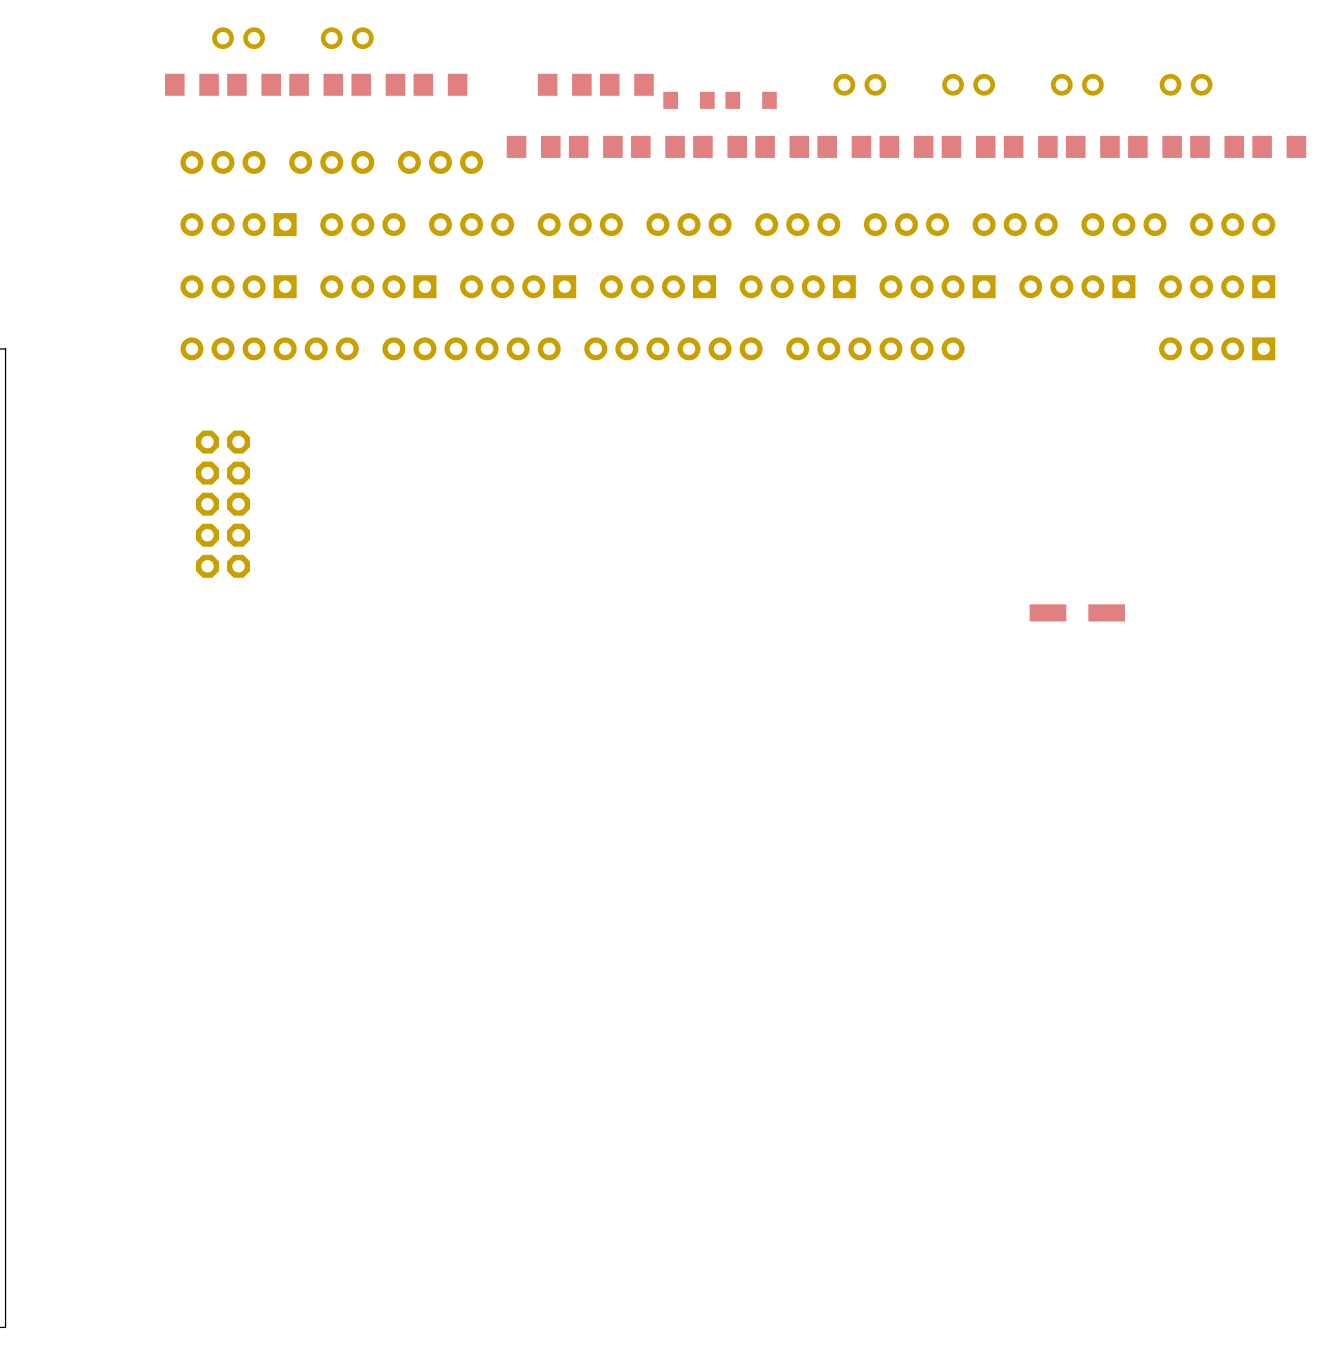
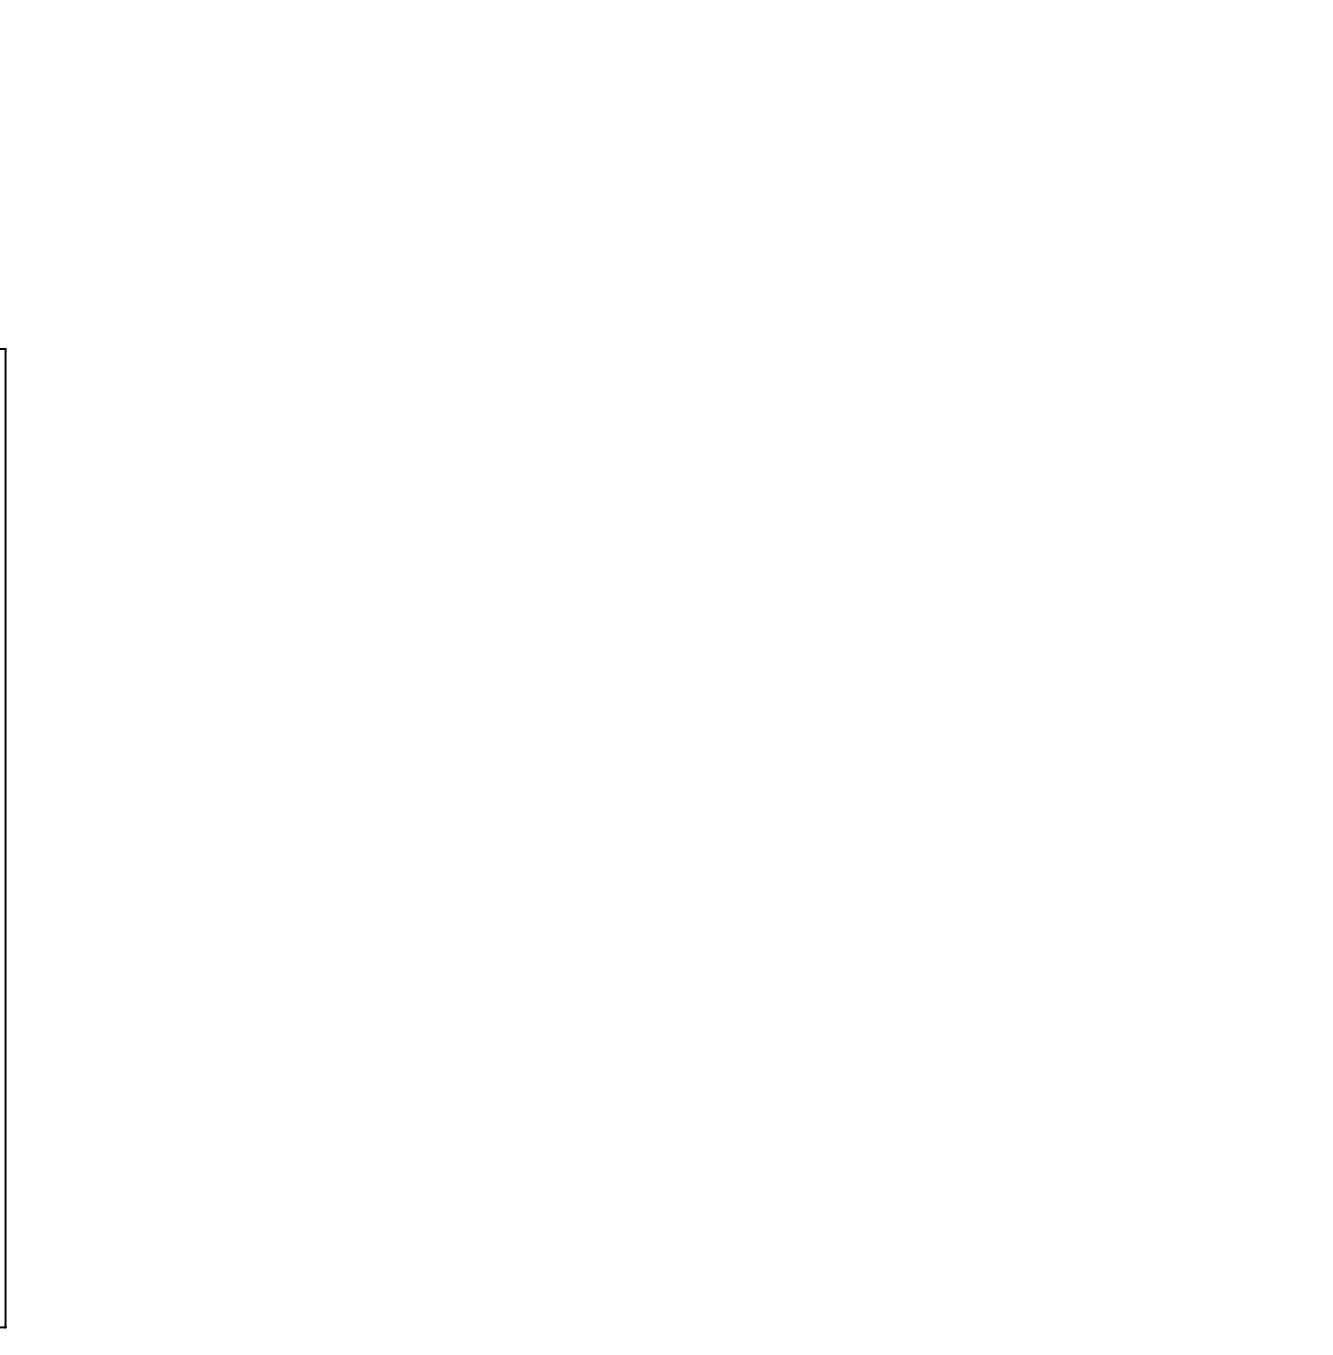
part: (238, 38) -> none
part: (347, 38) -> none
part: (191, 84) -> none
part: (254, 84) -> none
part: (316, 84) -> none
part: (378, 84) -> none
part: (440, 84) -> none
part: (564, 84) -> none
part: (626, 84) -> none
part: (859, 84) -> none
part: (968, 84) -> none
part: (1077, 84) -> none
part: (1186, 84) -> none
part: (689, 100) -> none
part: (751, 100) -> none
part: (533, 146) -> none
part: (595, 146) -> none
part: (657, 146) -> none
part: (720, 146) -> none
part: (782, 146) -> none
part: (844, 146) -> none
part: (906, 146) -> none
part: (968, 146) -> none
part: (1030, 146) -> none
part: (1092, 146) -> none
part: (1154, 146) -> none
part: (1217, 146) -> none
part: (1279, 146) -> none
part: (223, 162) -> none
part: (331, 162) -> none
part: (440, 162) -> none
part: (238, 224) -> none
part: (362, 224) -> none
part: (471, 224) -> none
part: (580, 224) -> none
part: (689, 224) -> none
part: (797, 224) -> none
part: (906, 224) -> none
part: (1015, 224) -> none
part: (1123, 224) -> none
part: (1232, 224) -> none
part: (238, 286) -> none
part: (378, 286) -> none
part: (518, 286) -> none
part: (657, 286) -> none
part: (797, 286) -> none
part: (937, 286) -> none
part: (1077, 286) -> none
part: (1217, 286) -> none
part: (269, 348) -> none
part: (471, 348) -> none
part: (673, 348) -> none
part: (875, 348) -> none
part: (1217, 348) -> none
part: (223, 504) -> none
part: (1077, 612) -> none

